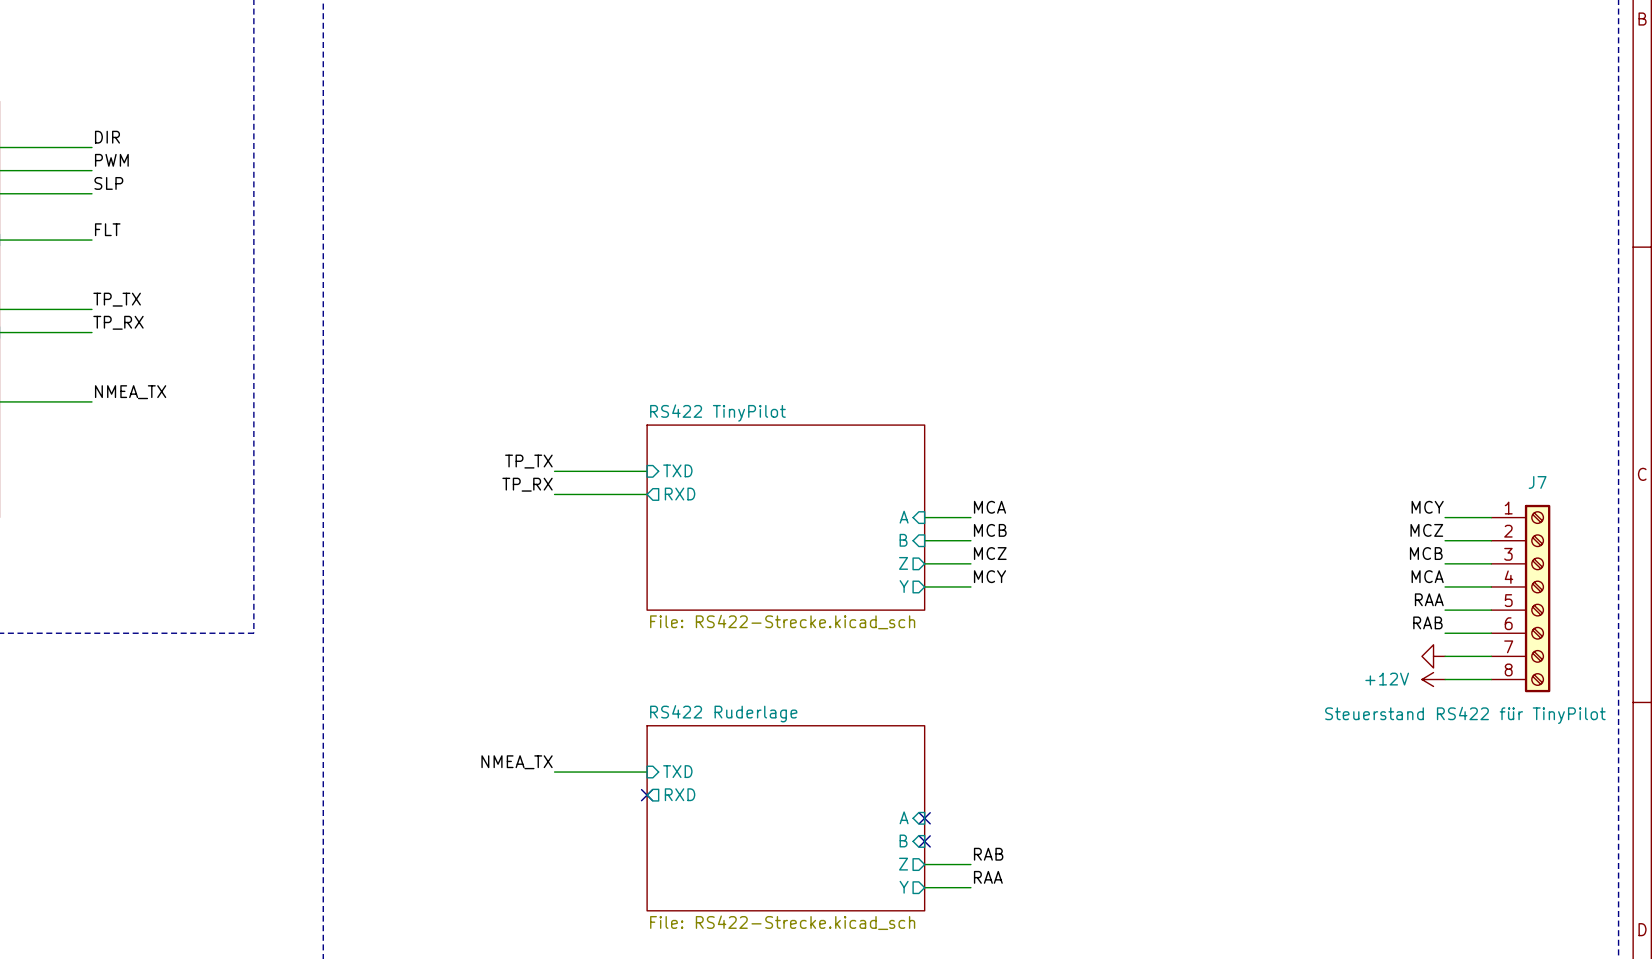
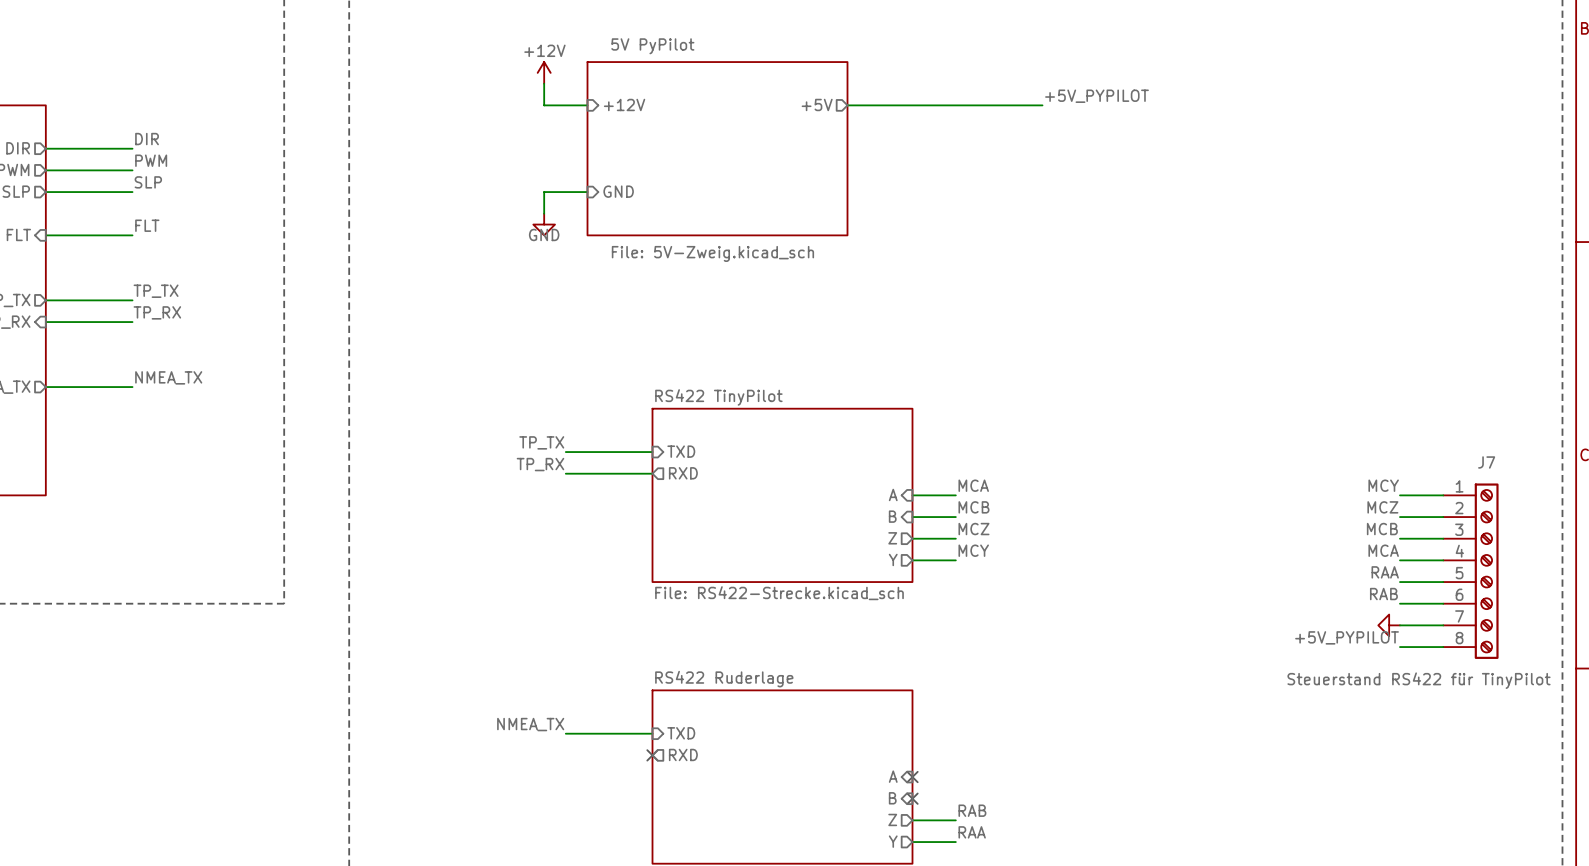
power symbol: none -> +12V (544, 72)
wire: none -> (544, 83) (544, 105) (587, 105)
label: none -> +5V_PYPILOT (1097, 96)
sheet pin: none -> +12V (624, 104)
sheet pin: none -> +5V (817, 104)
wire: none -> (847, 105) (1042, 105)
sheet 5V PyPilot: none -> File: 5V-Zweig.kicad_sch (717, 148)
wire: none -> (587, 192) (544, 192) (544, 213)
sheet pin: none -> GND (618, 191)
power symbol: none -> GND (544, 224)
label: none -> +5V_PYPILOT (1347, 637)
power symbol: +12V (1433, 679) -> none

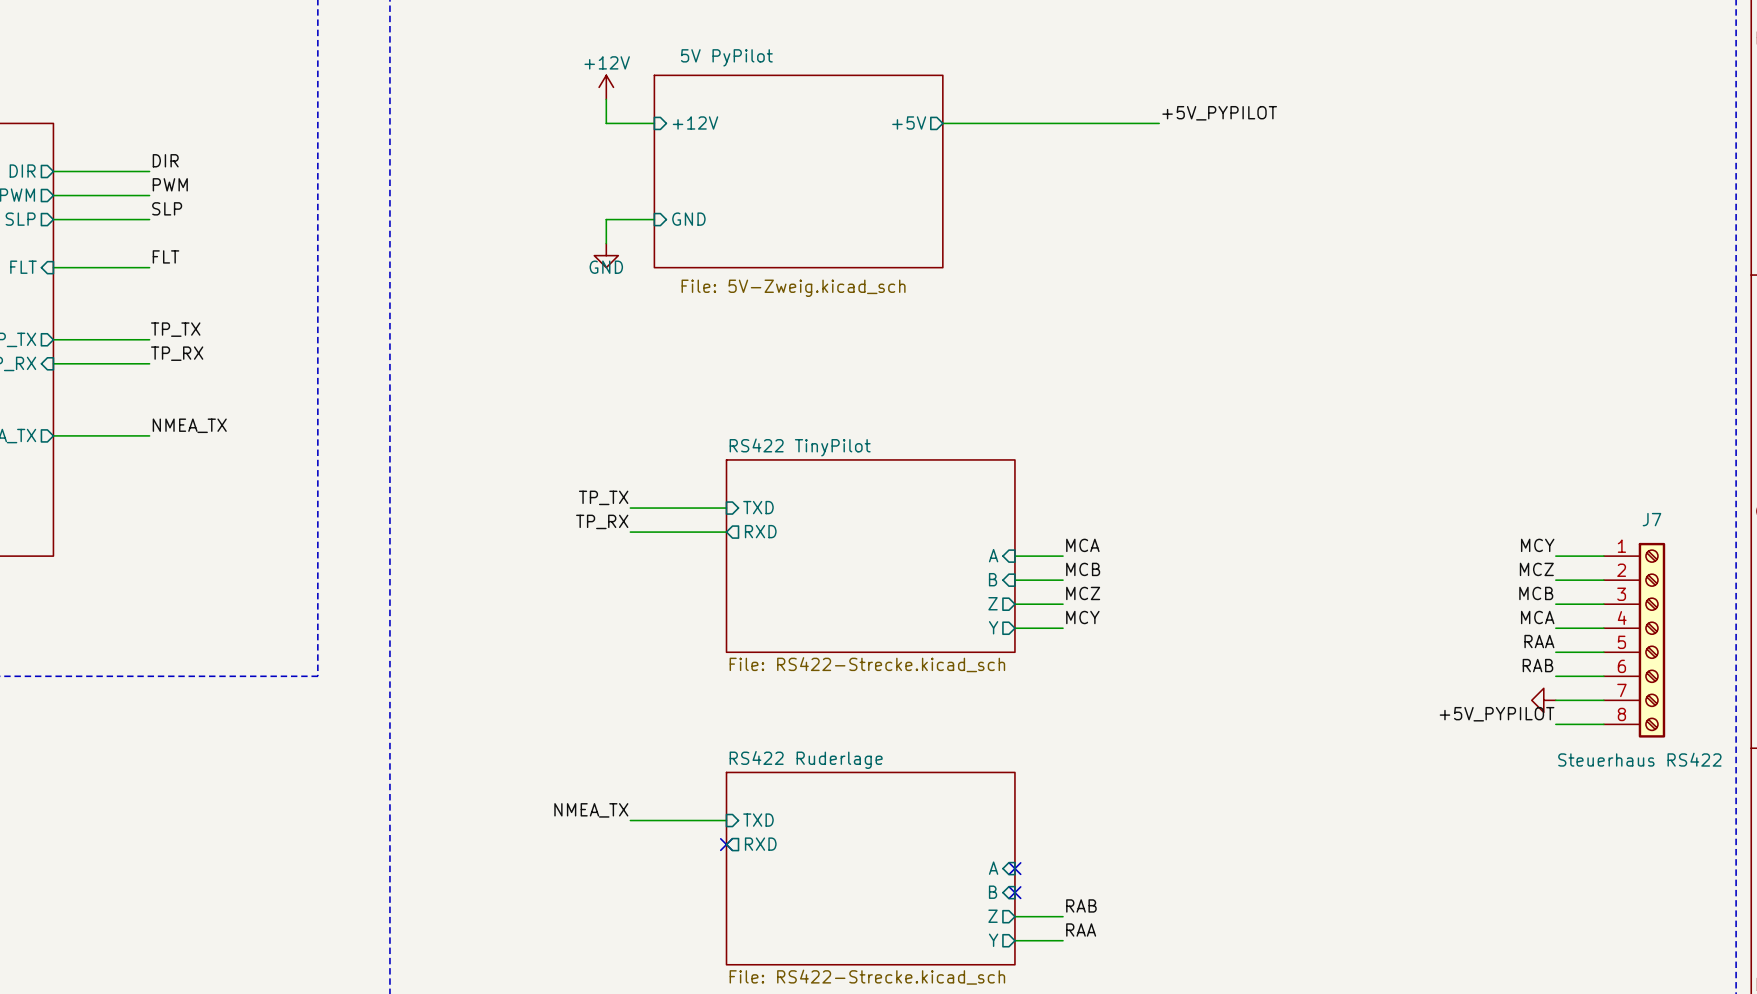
J7 value: Steuerstand RS422 für TinyPilot (1418, 680) -> Steuerhaus RS422 (1639, 759)

